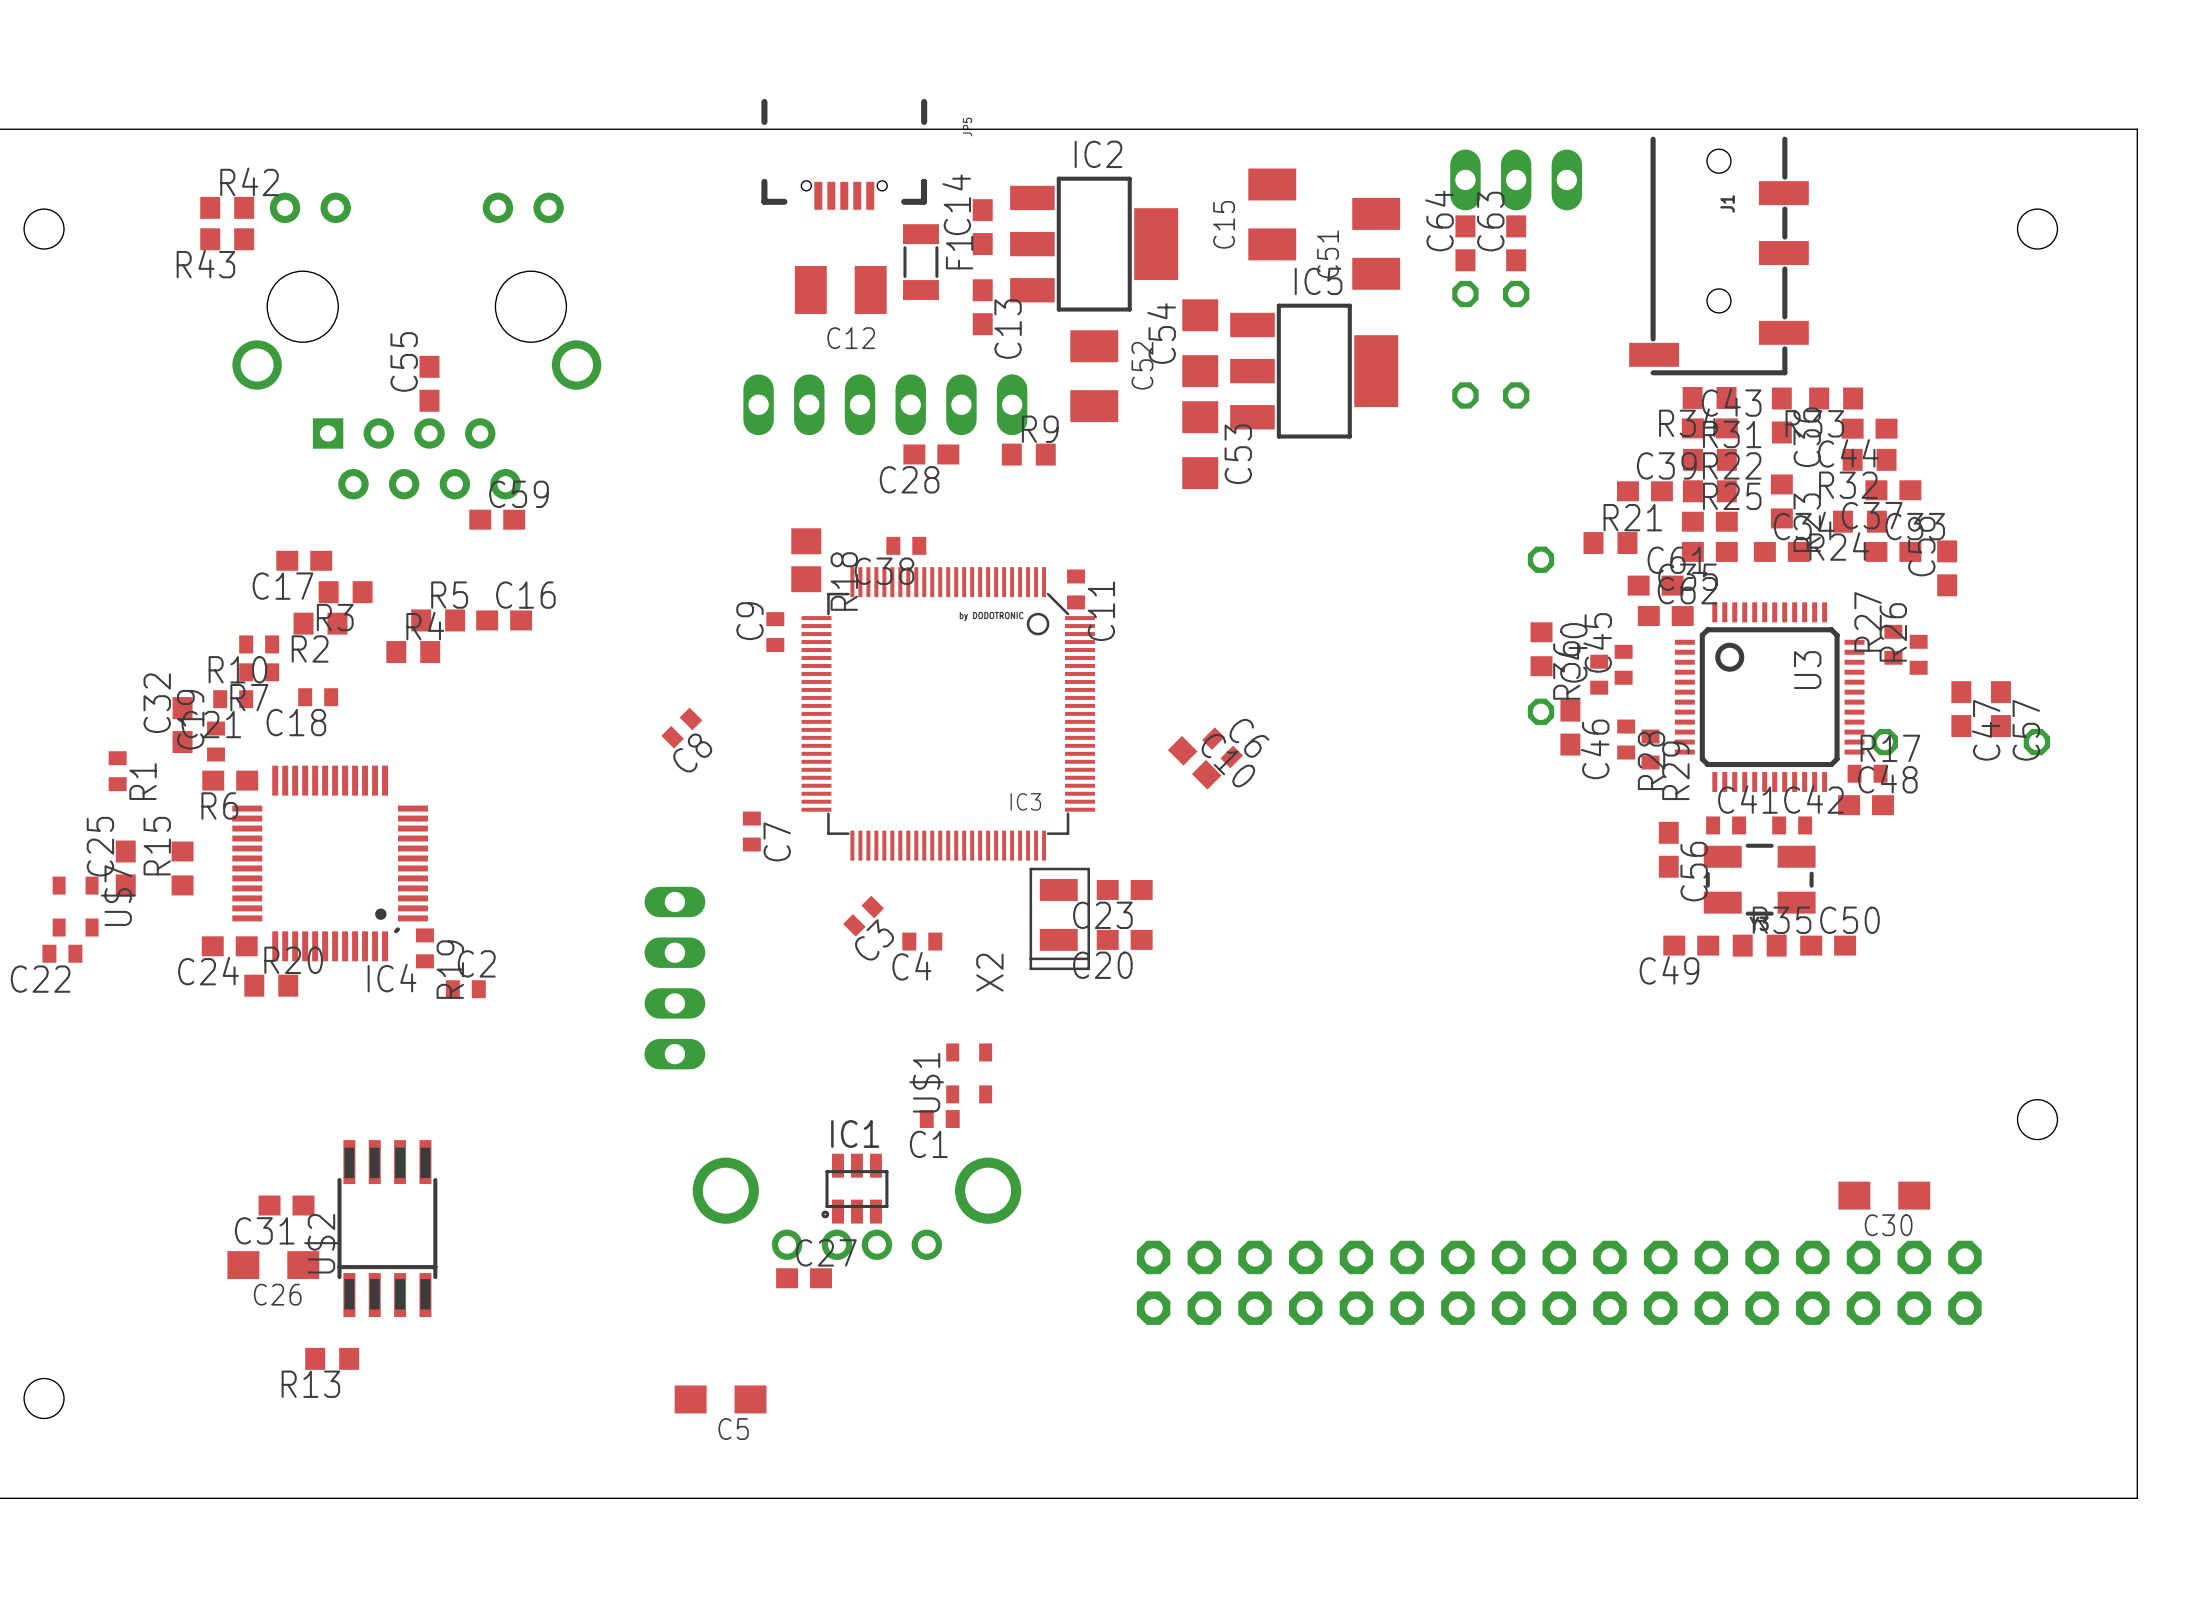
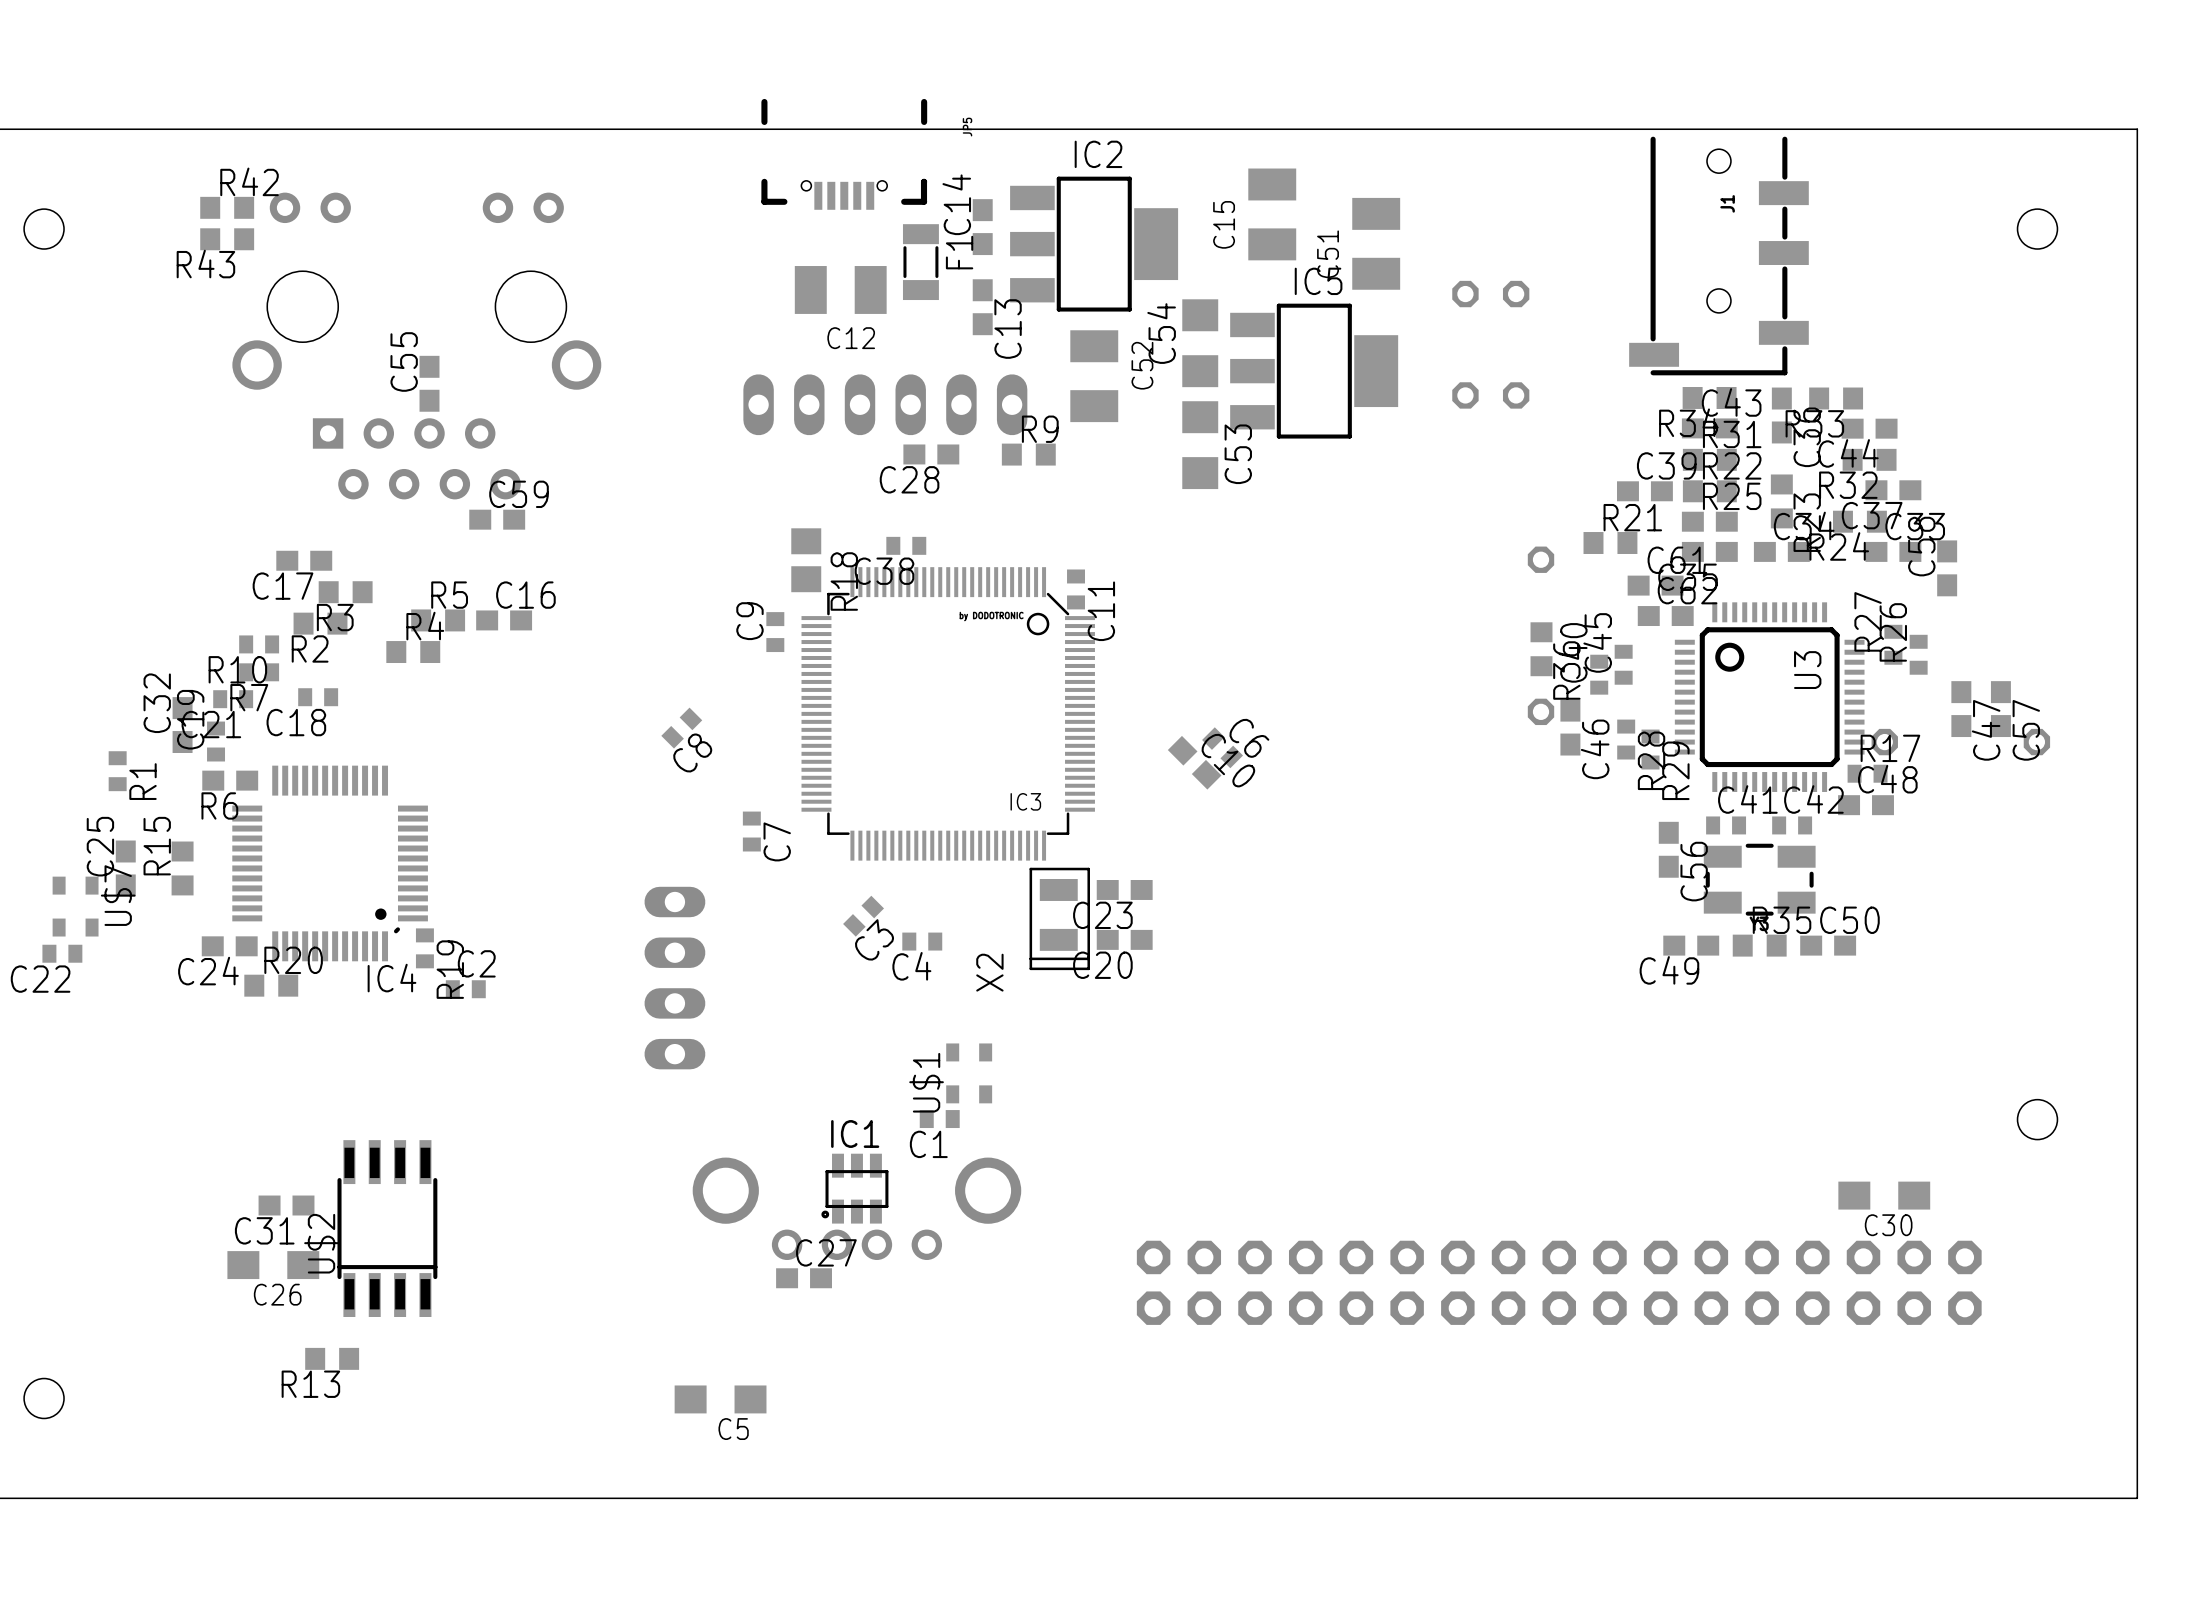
part: (1516, 179) -> none
C64: (1465, 243) -> none
C63: (1516, 243) -> none

